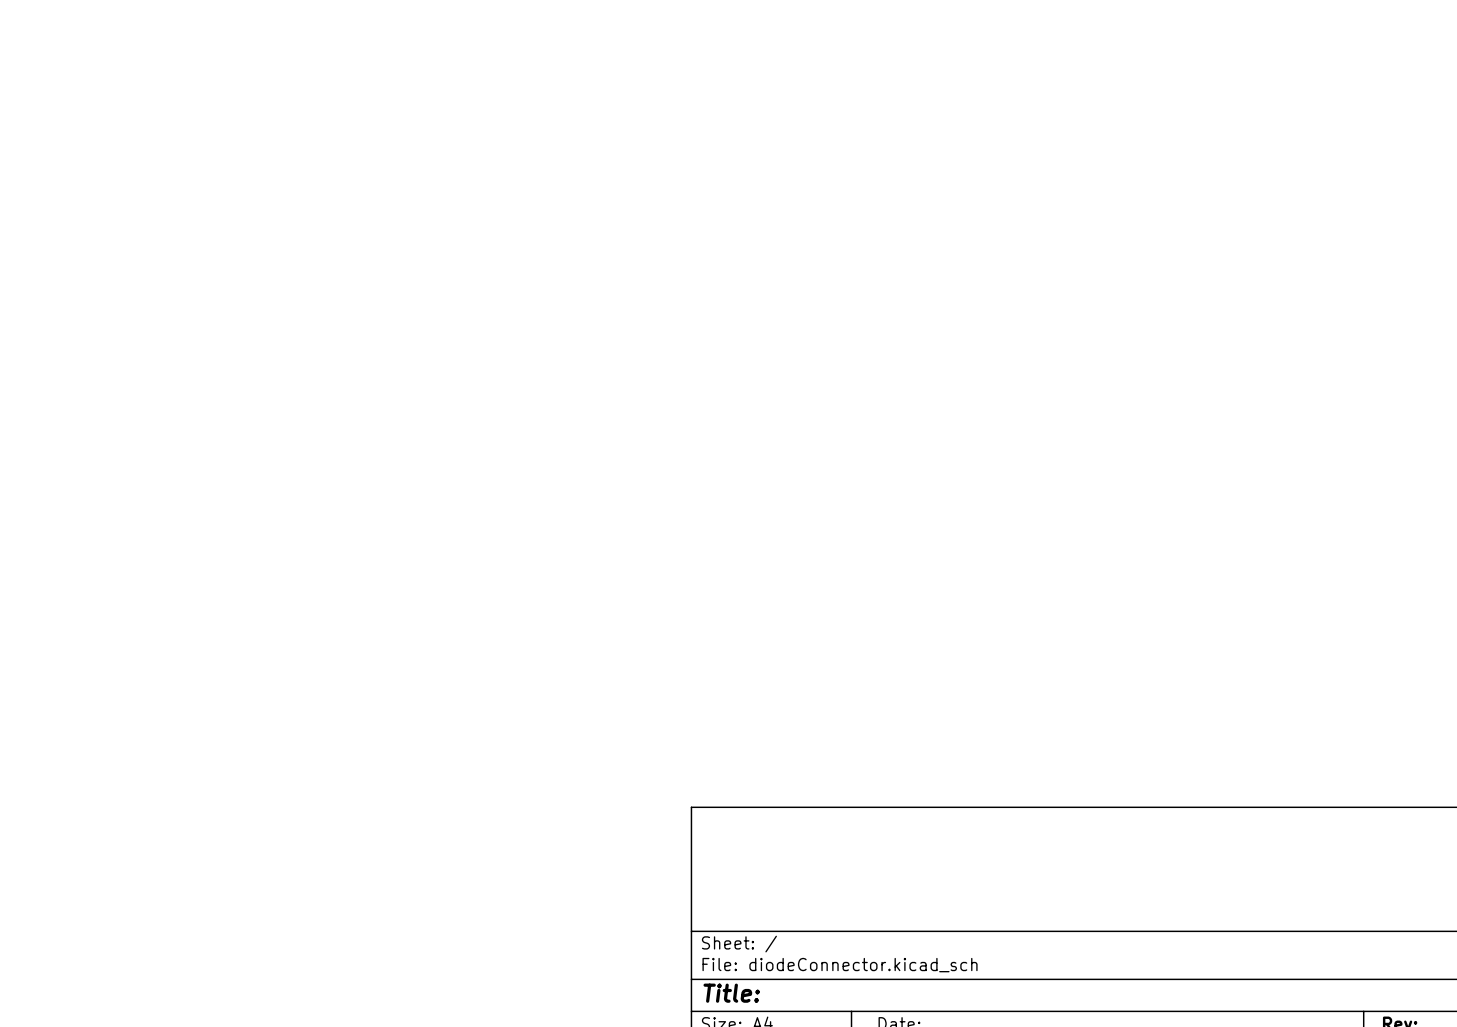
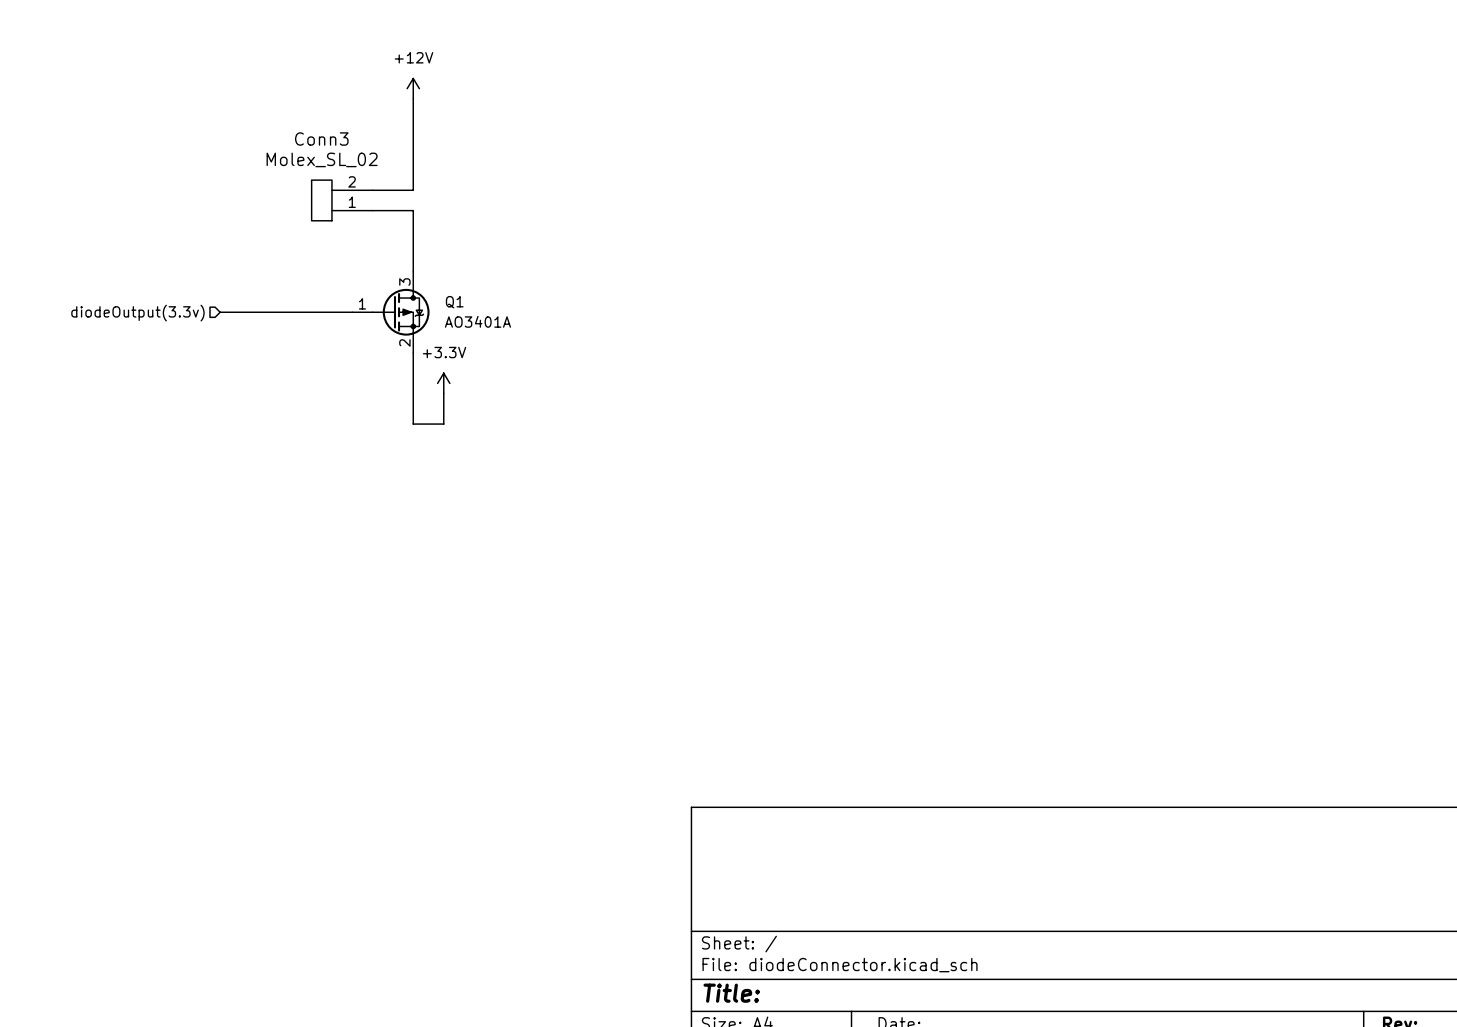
power symbol: none -> +12V (413, 88)
wire: none -> (413, 98) (413, 190) (372, 190)
Conn3: none -> Molex_SL_02 (342, 200)
wire: none -> (372, 210) (413, 210) (413, 271)
wire: none -> (220, 312) (352, 312)
Q1: none -> AO3401A (390, 312)
hierarchical label: none -> diodeOutput(3.3v) (137, 313)
wire: none -> (413, 352) (413, 424) (443, 424) (443, 393)
power symbol: none -> +3.3V (443, 383)

